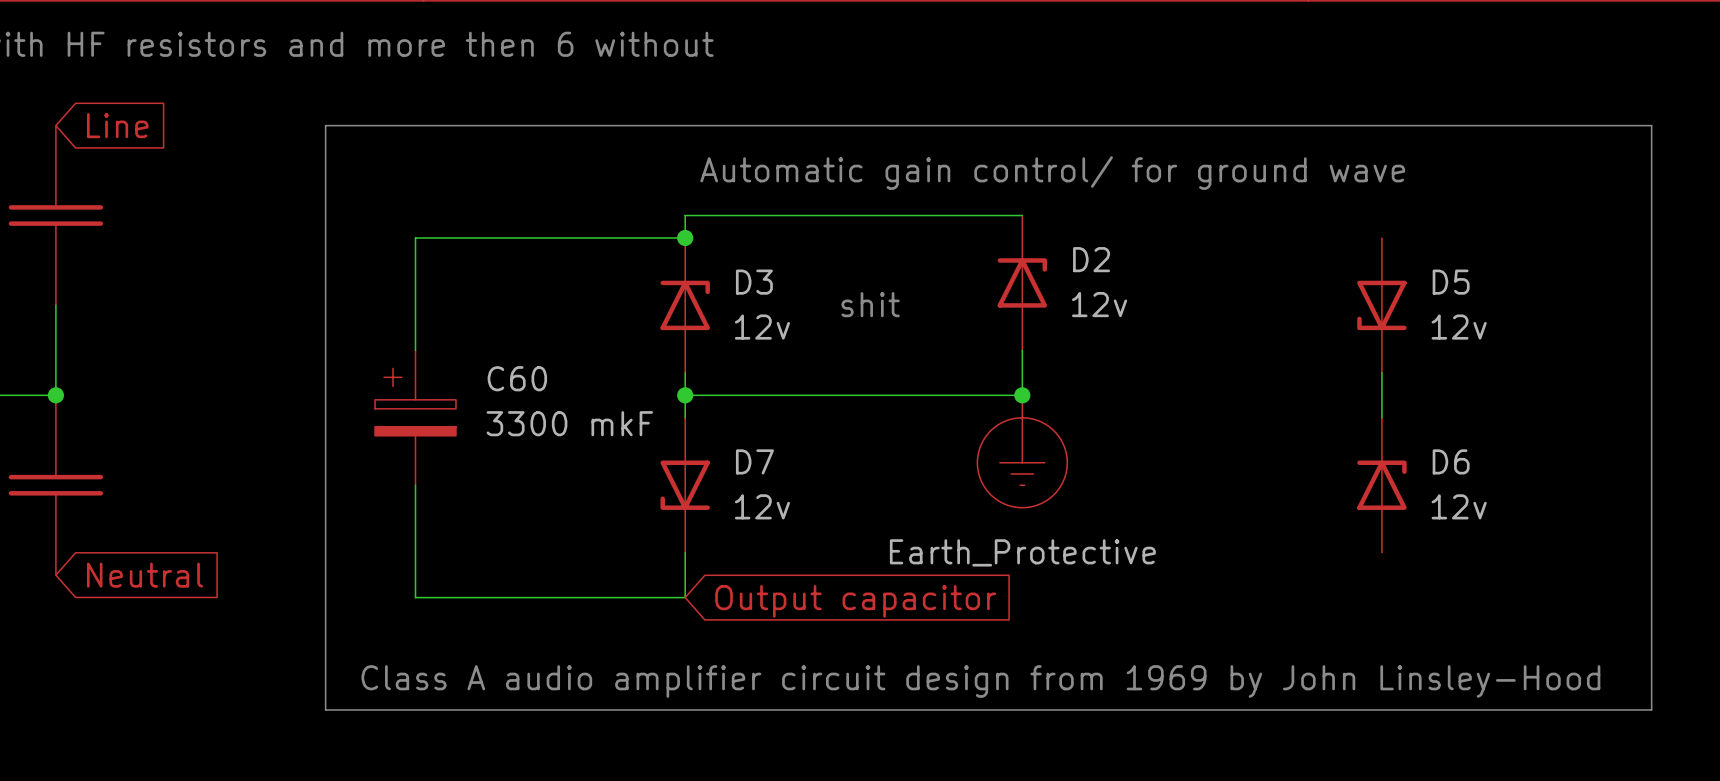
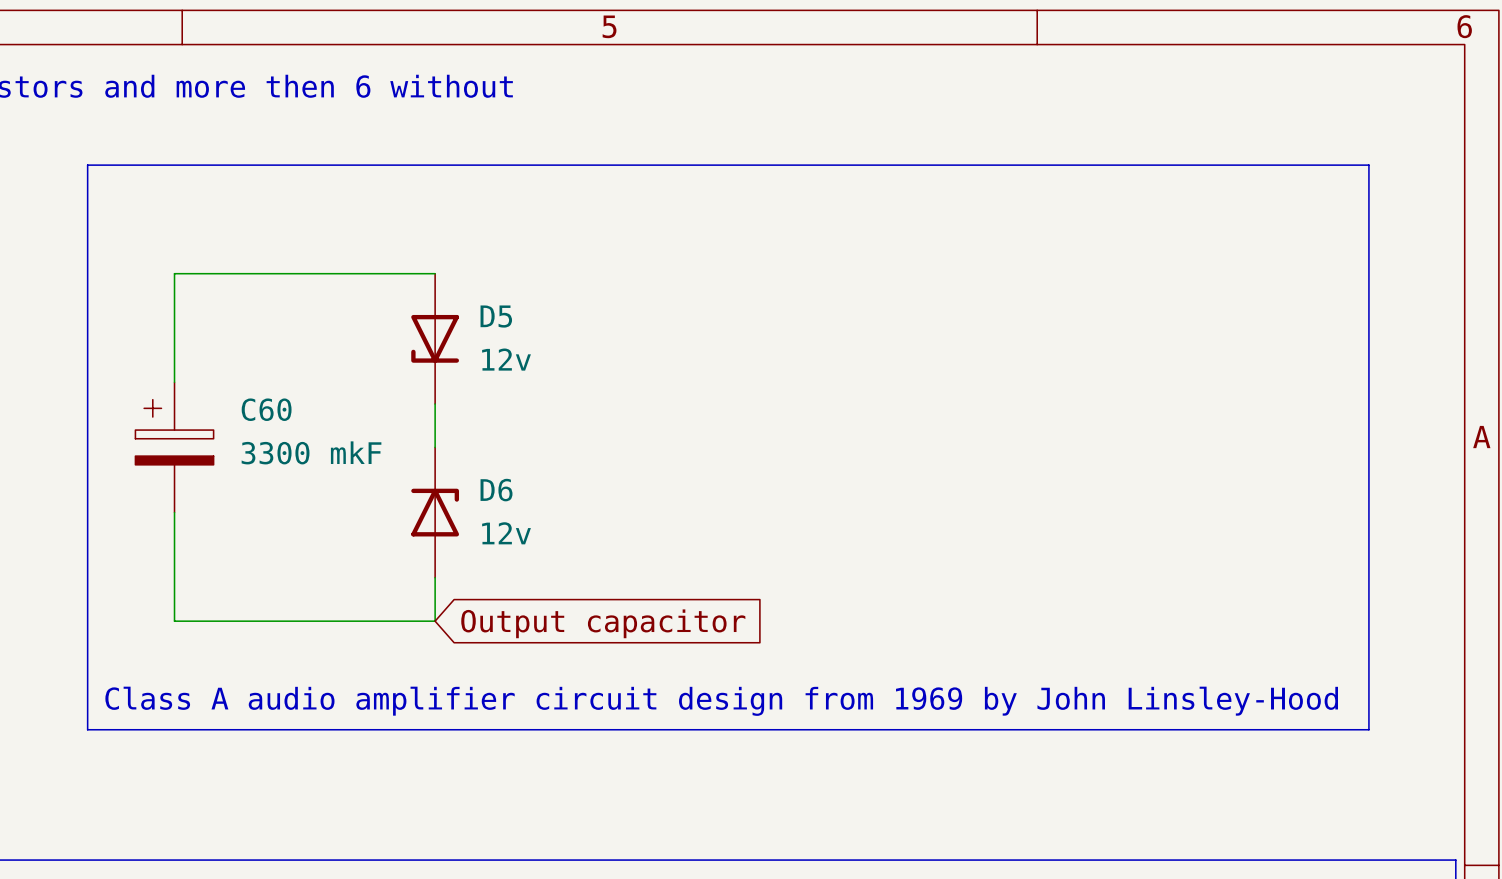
text: Automatic gain control/ for ground wave (1052, 173) -> none
wire: (1022, 215) (685, 215) (685, 238) -> none
junction: (685, 238) -> none
D2: 12v (1022, 282) -> none
text: shit (870, 304) -> none
D3: 12v (685, 305) -> none
D5 position: (1381, 305) -> (435, 338)
wire: (1022, 350) (1022, 395) (685, 395) -> none
wire: (1381, 372) (1381, 417) -> none
junction: (685, 395) -> none
junction: (1022, 395) -> none
power symbol: Earth_Protective (1022, 451) -> none
D7: 12v (685, 485) -> none
D6 position: (1381, 485) -> (435, 512)

